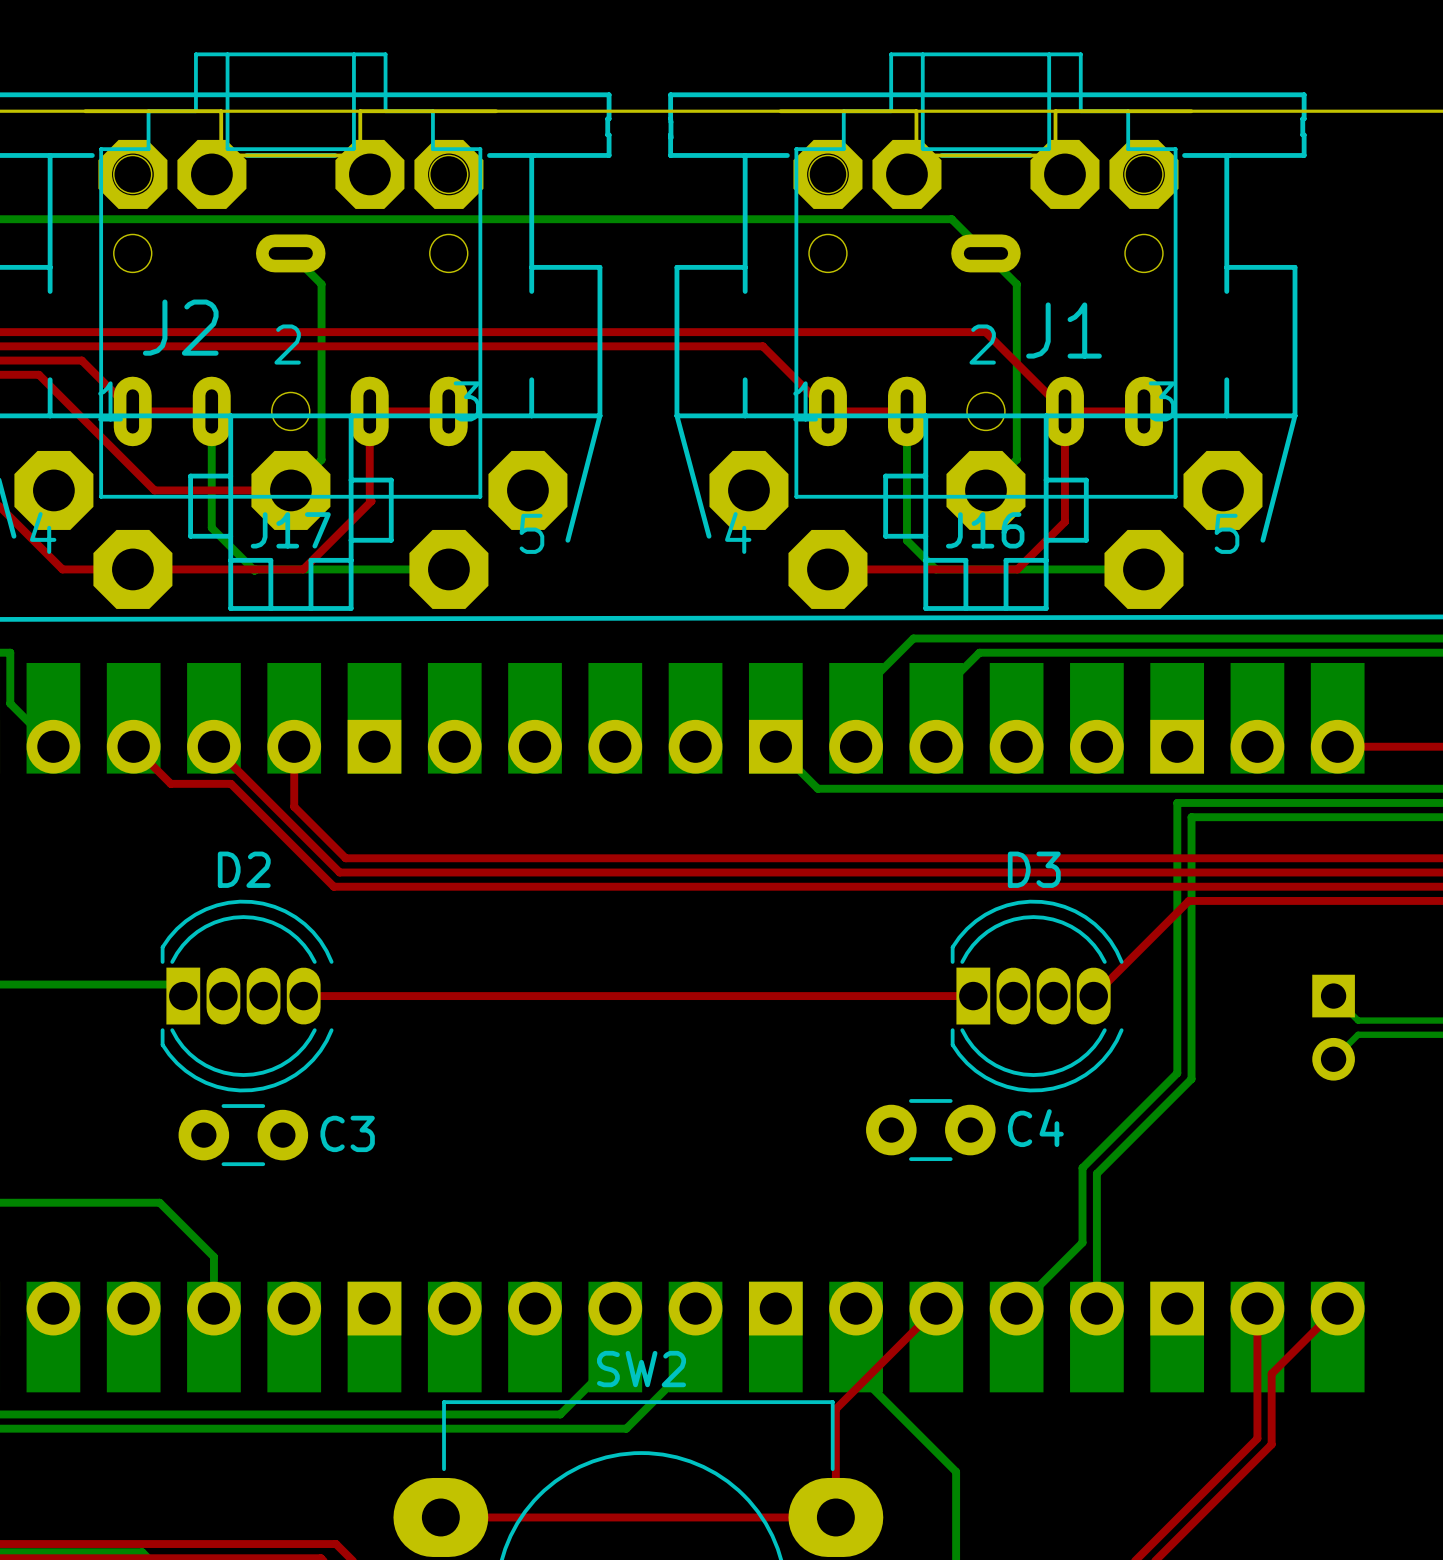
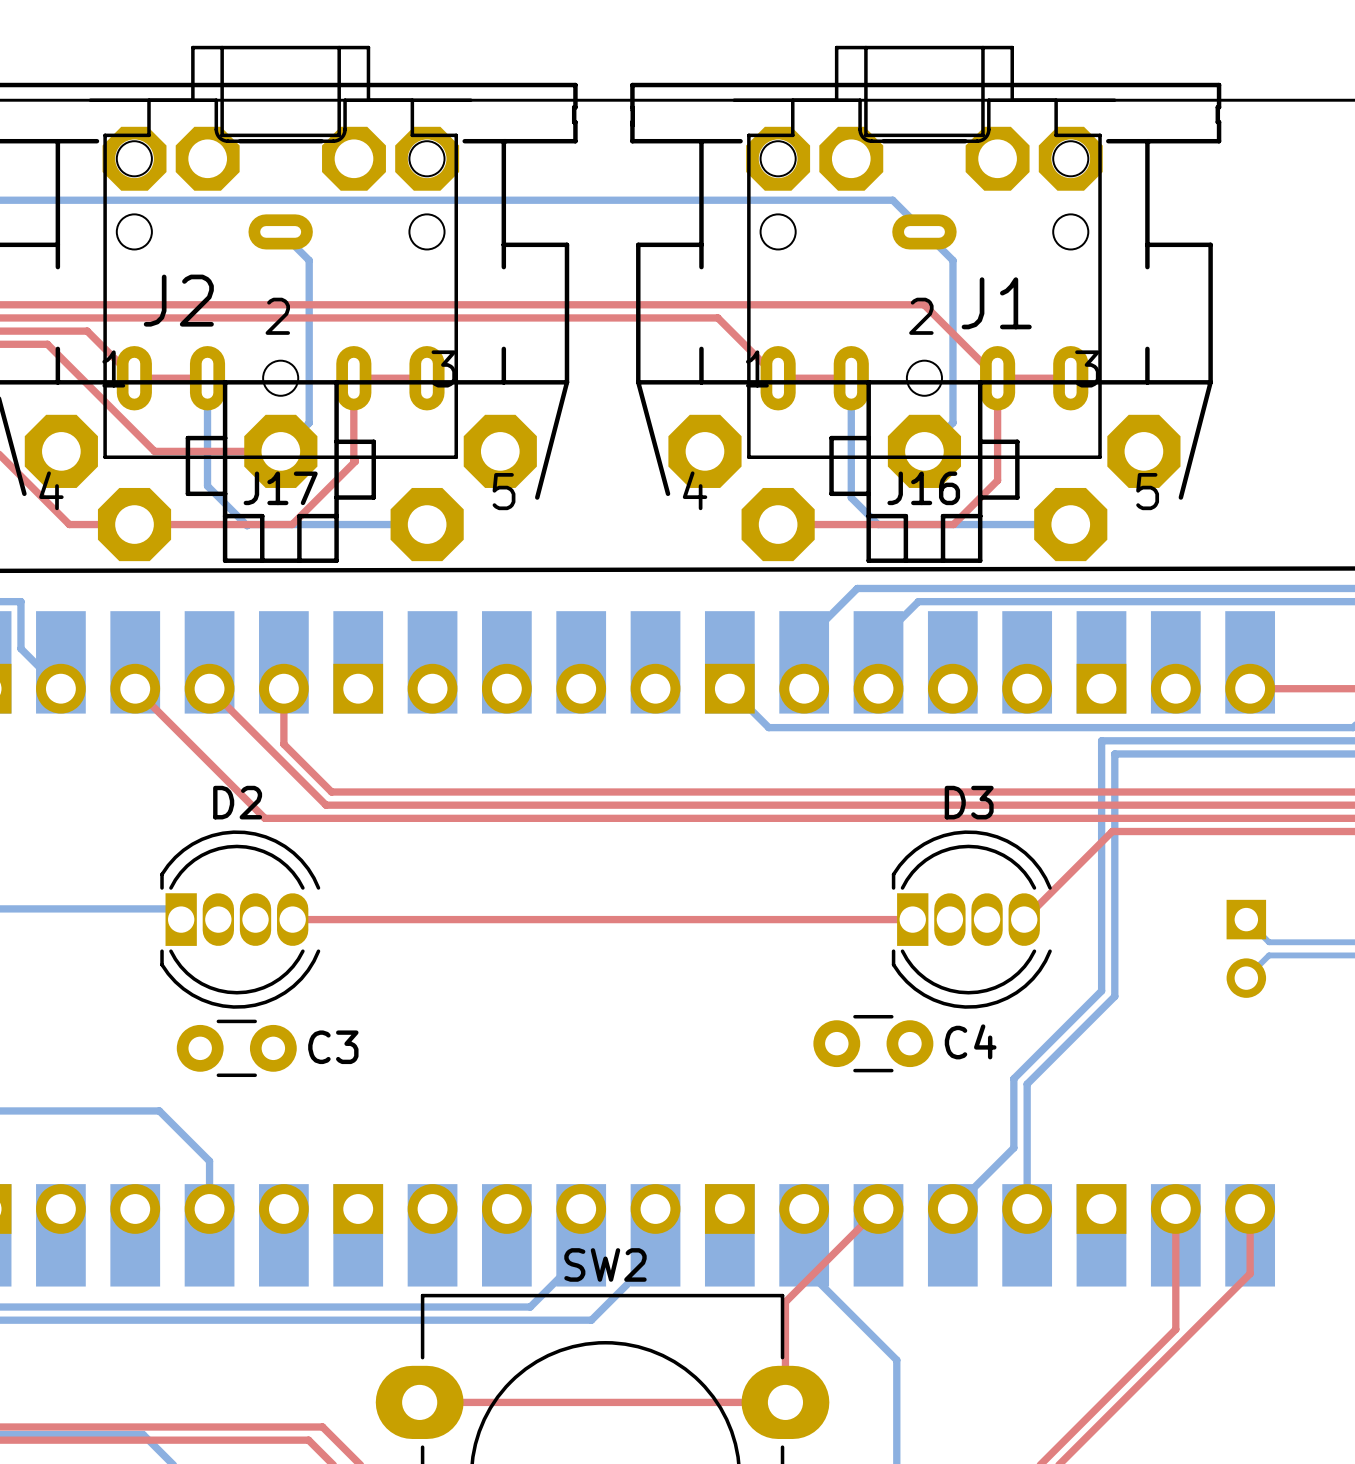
top track: (170, 783) (230, 783) (333, 886) -> (169, 723) (264, 818) (320, 818)
top track: (1337, 1308) (1271, 1373) (1271, 1444) -> (1250, 1208) (1250, 1273) (1188, 1334)

